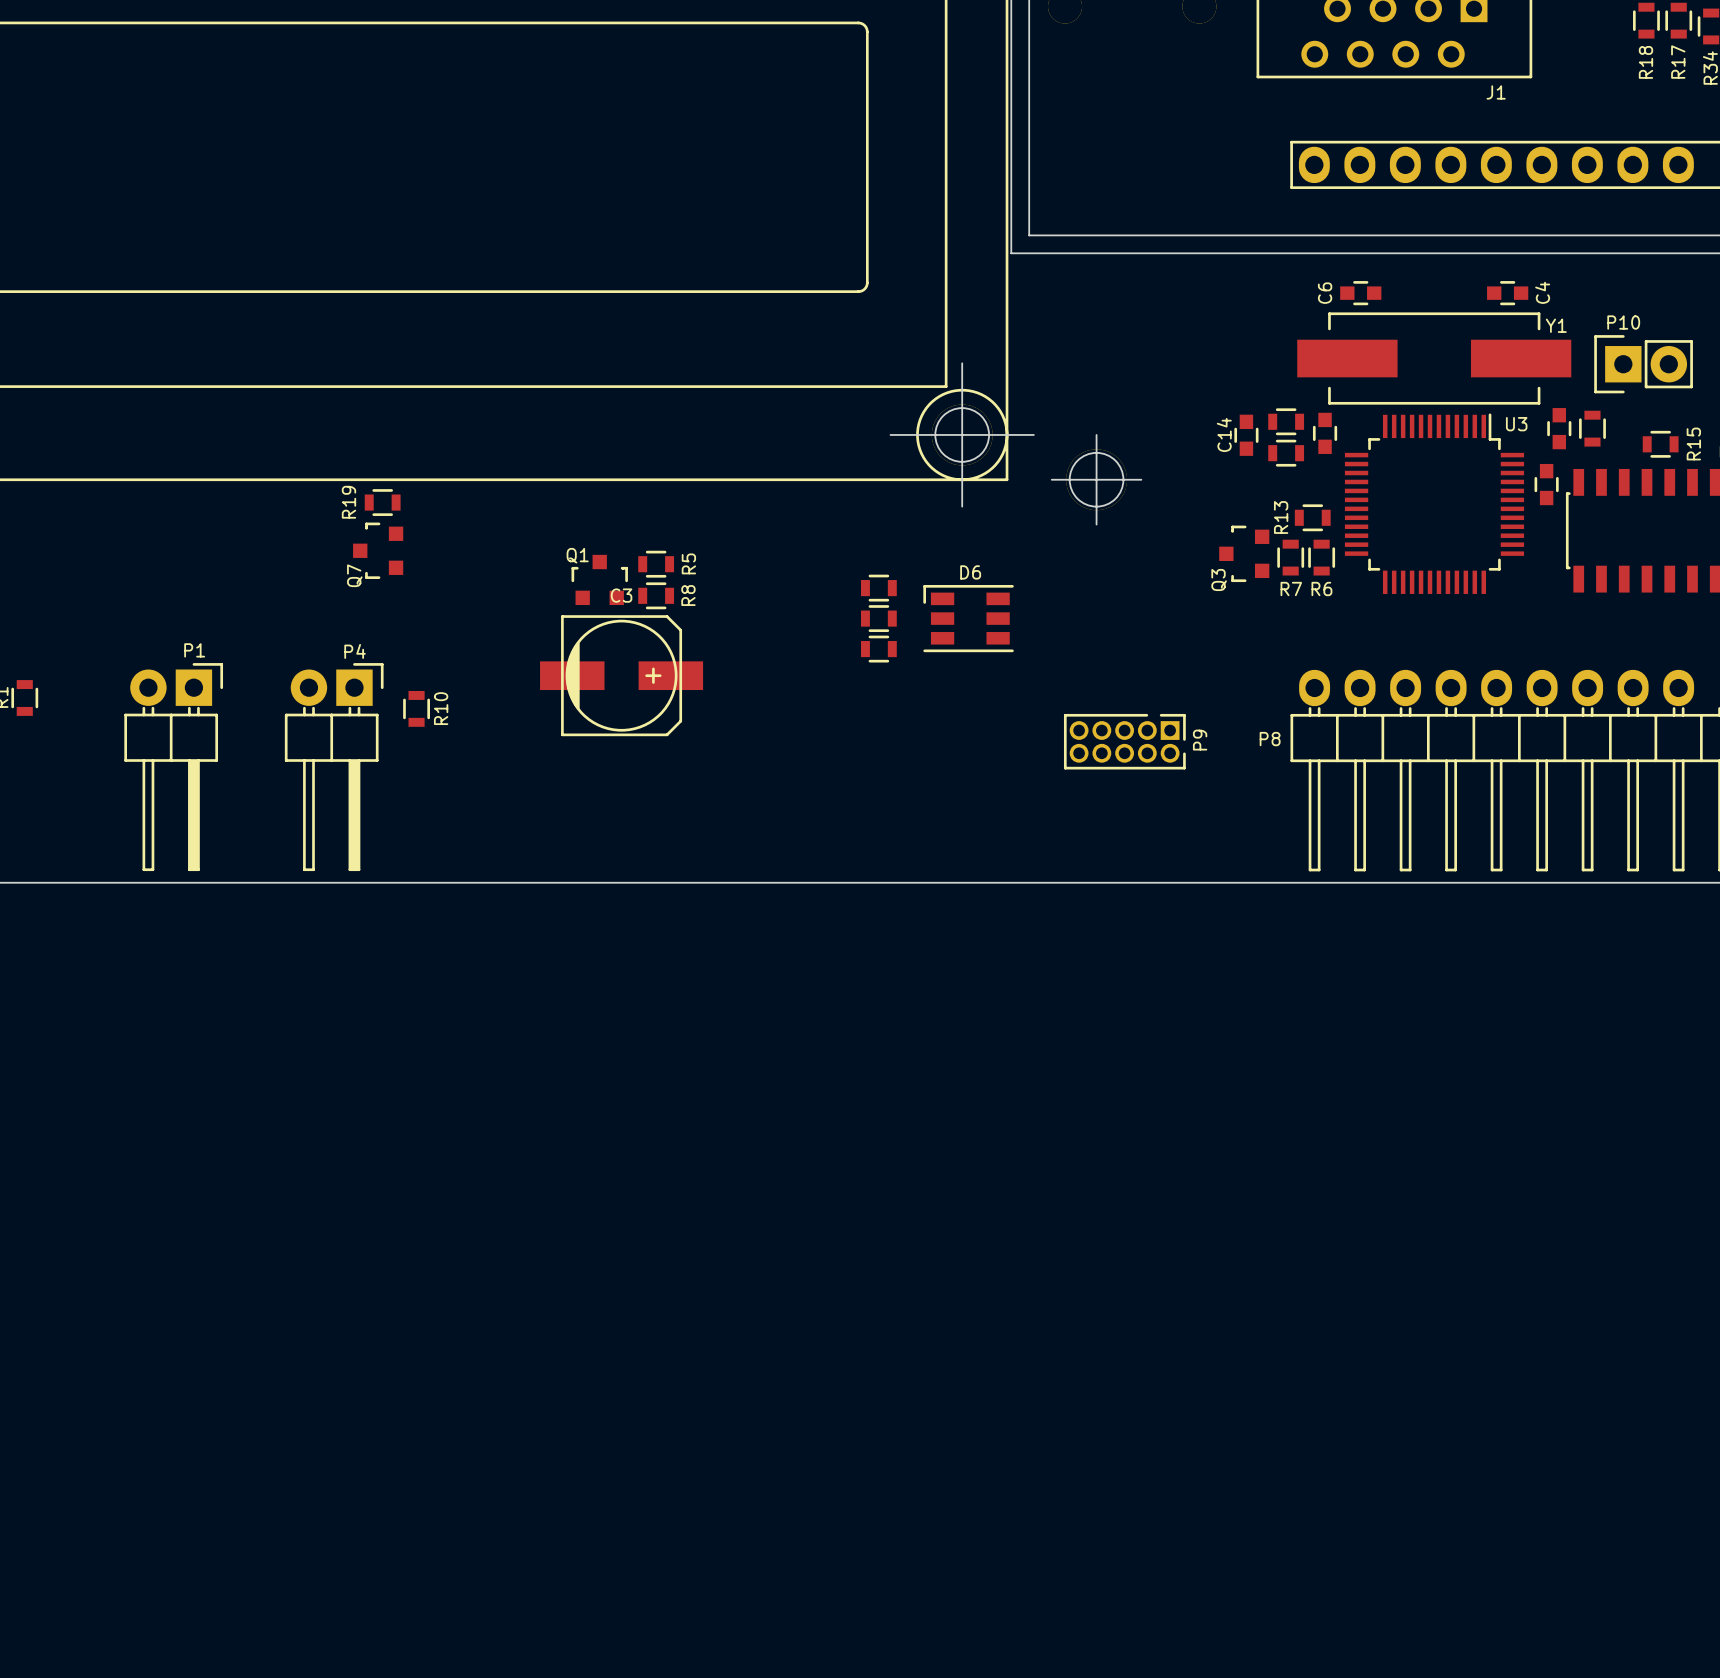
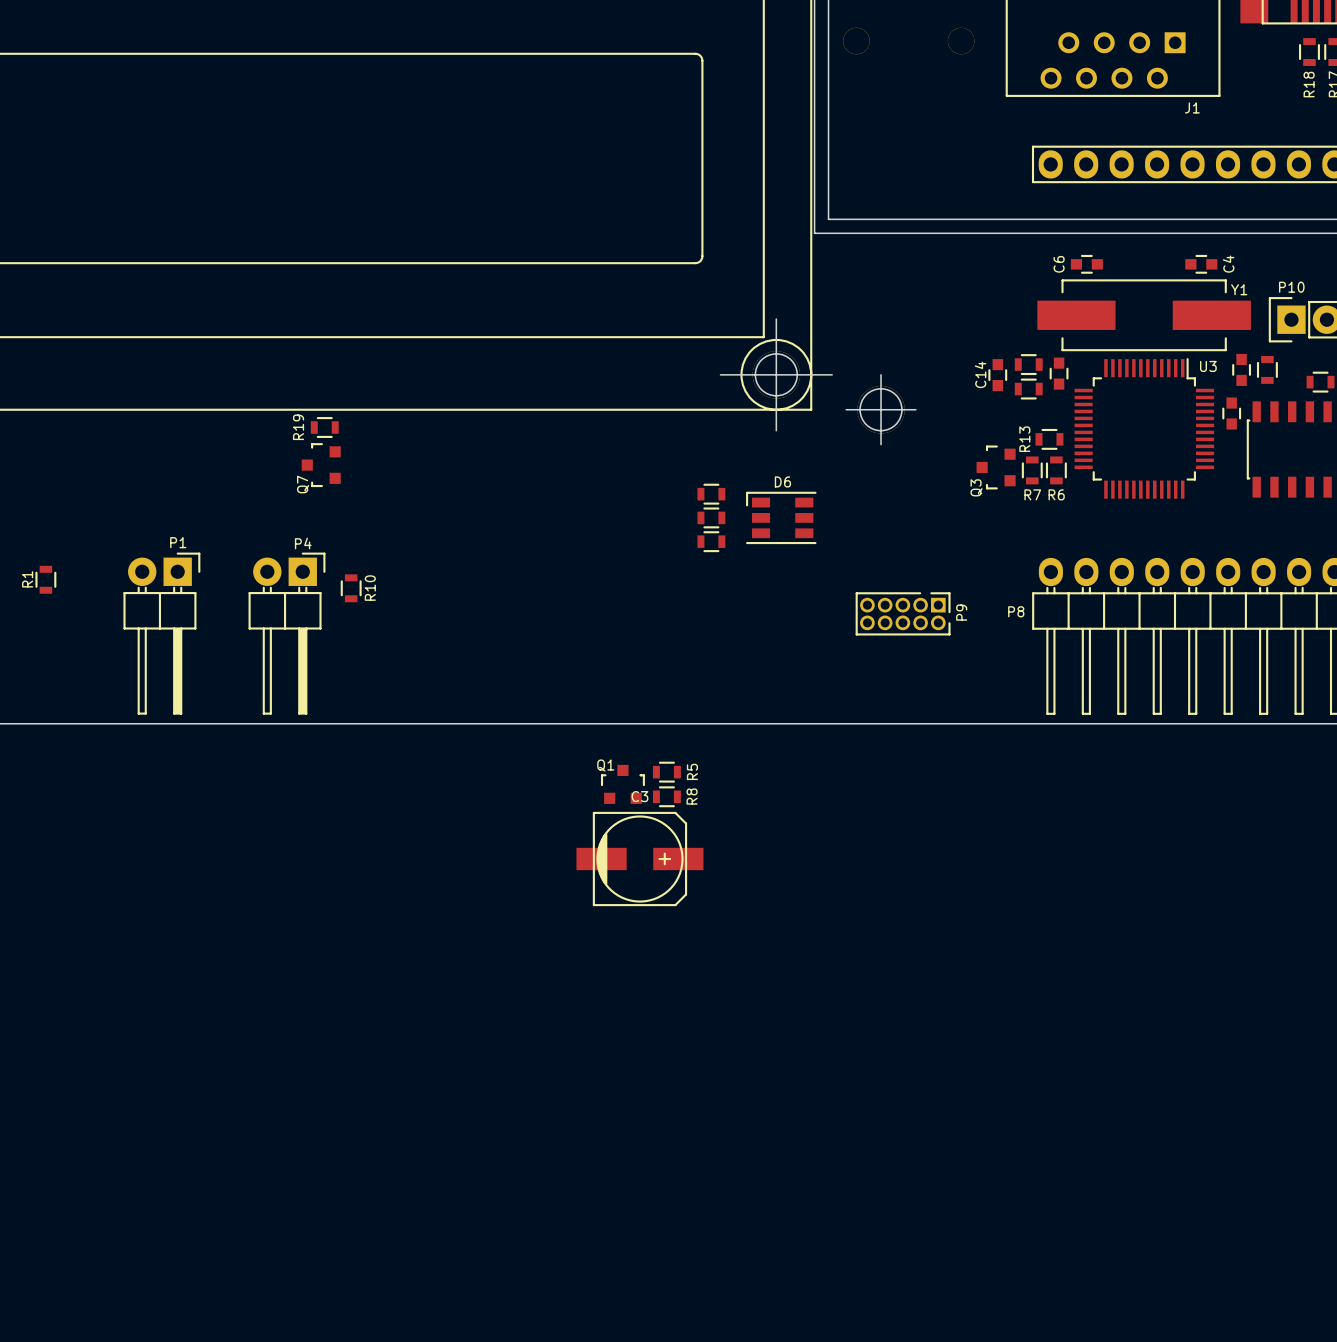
R5 position: (656, 564) -> (666, 772)
Q1 position: (599, 579) -> (622, 784)
R8 position: (656, 595) -> (666, 796)
C3 position: (621, 675) -> (639, 859)

